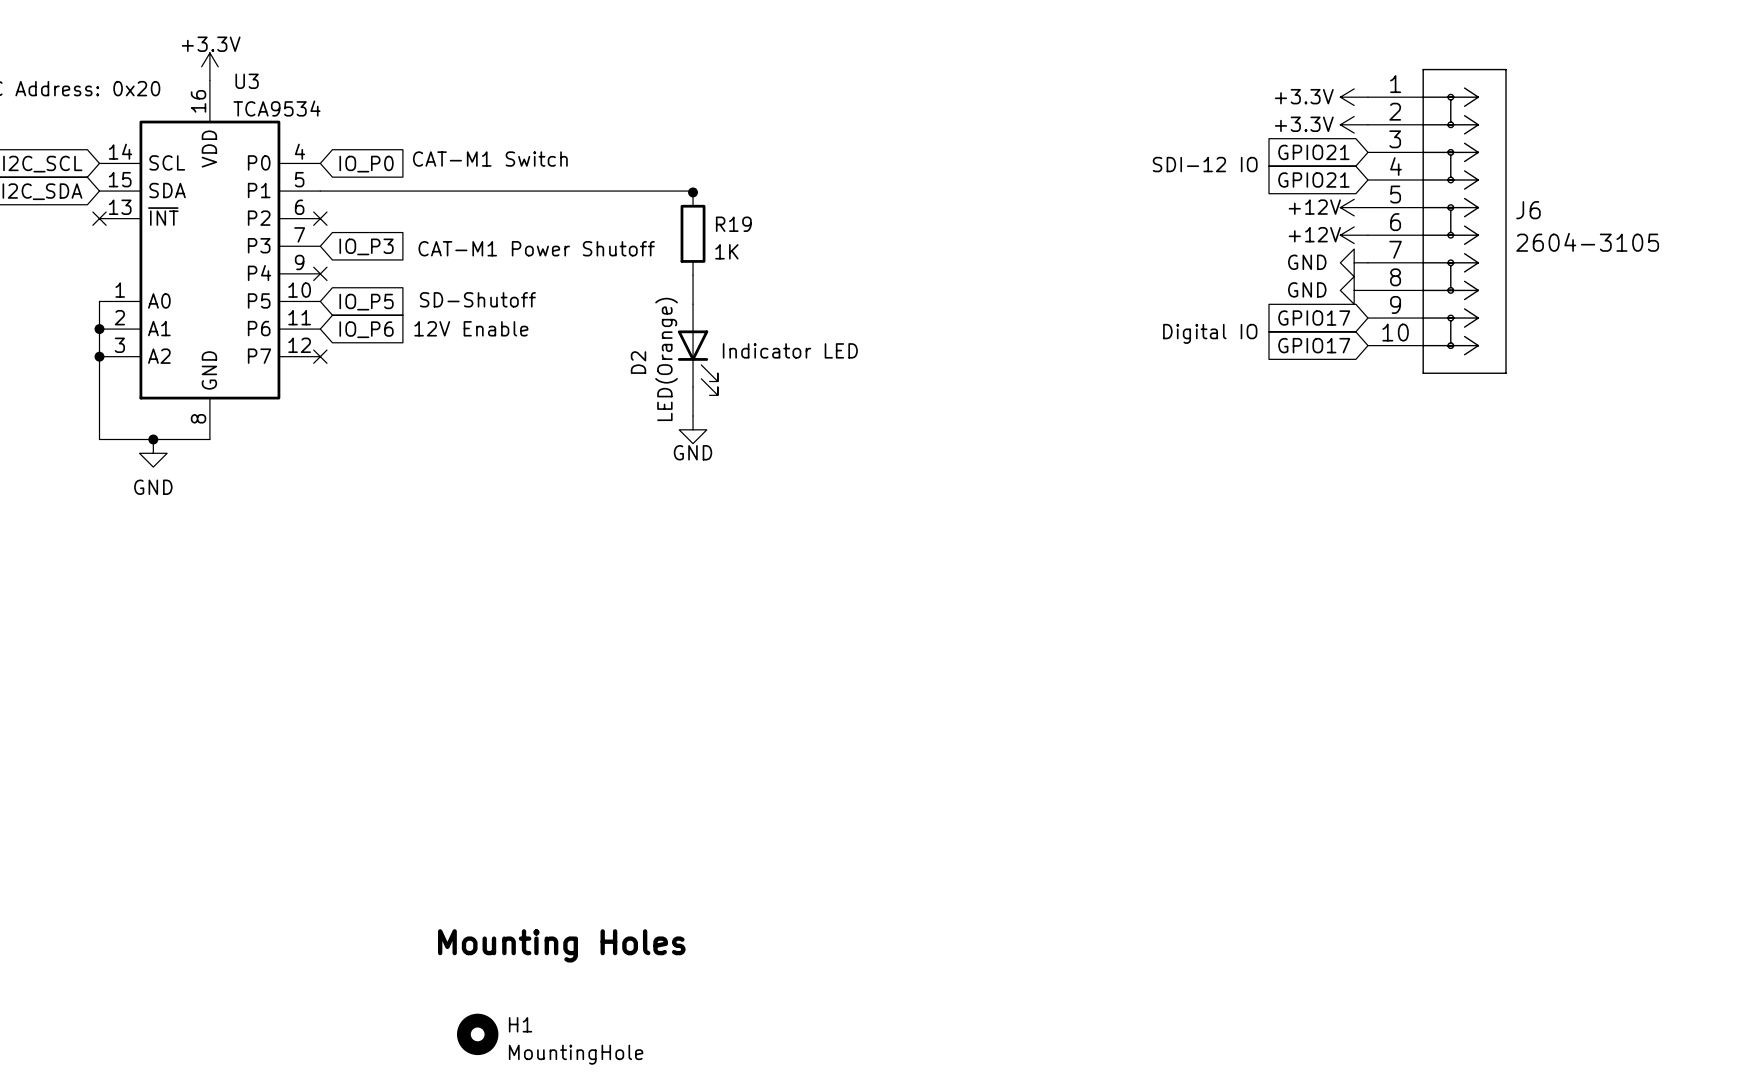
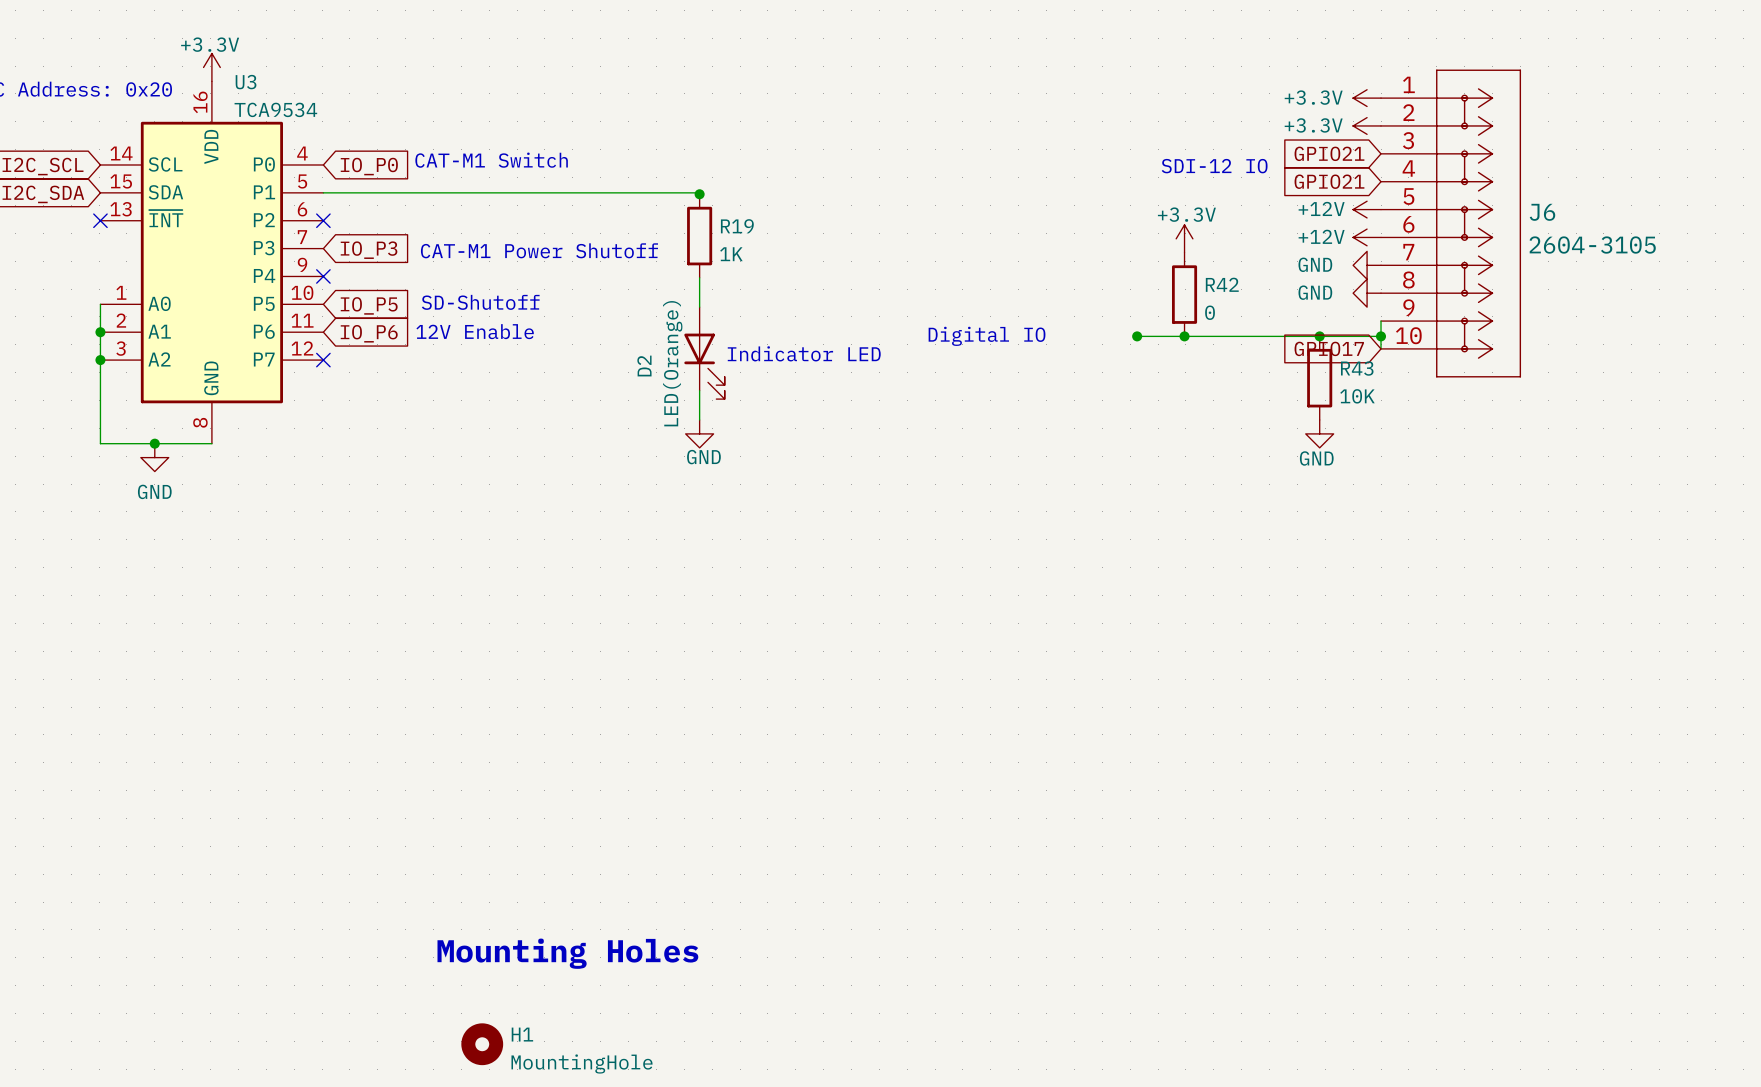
power symbol: none -> +3.3V (1184, 238)
R42: none -> 0 (1184, 294)
global label: GPIO17 (1314, 318) -> none
wire: none -> (1381, 321) (1381, 348)
wire: none -> (1137, 336) (1381, 336)
junction: none -> (1137, 336)
junction: none -> (1184, 336)
text position: Digital IO (1210, 333) -> Digital IO (987, 336)
junction: none -> (1319, 336)
junction: none -> (1381, 336)
R43: none -> 10K (1319, 378)
power symbol: none -> GND (1319, 433)

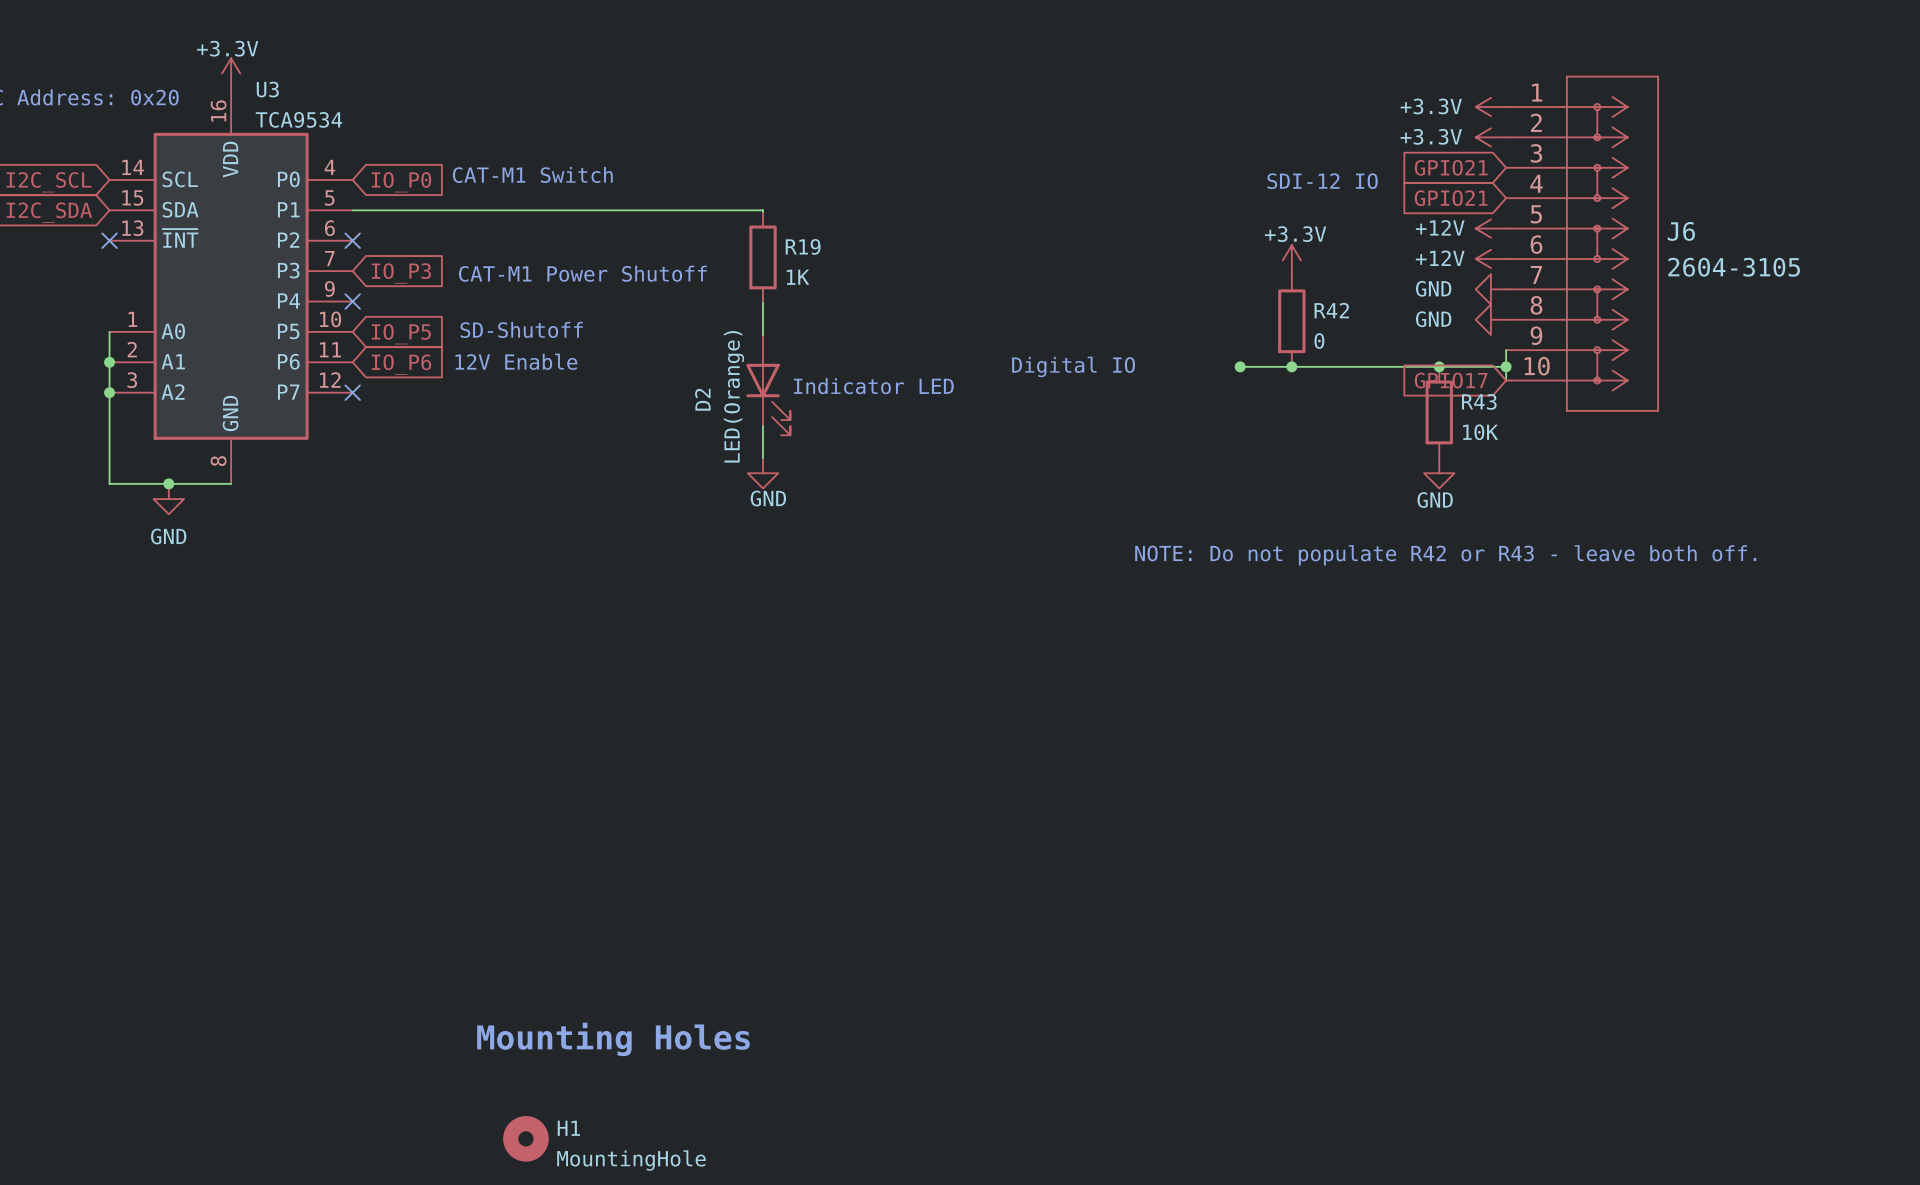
junction: (699, 194) -> none
text: none -> NOTE: Do not populate R42 or R43 - leave both off. (1445, 555)

